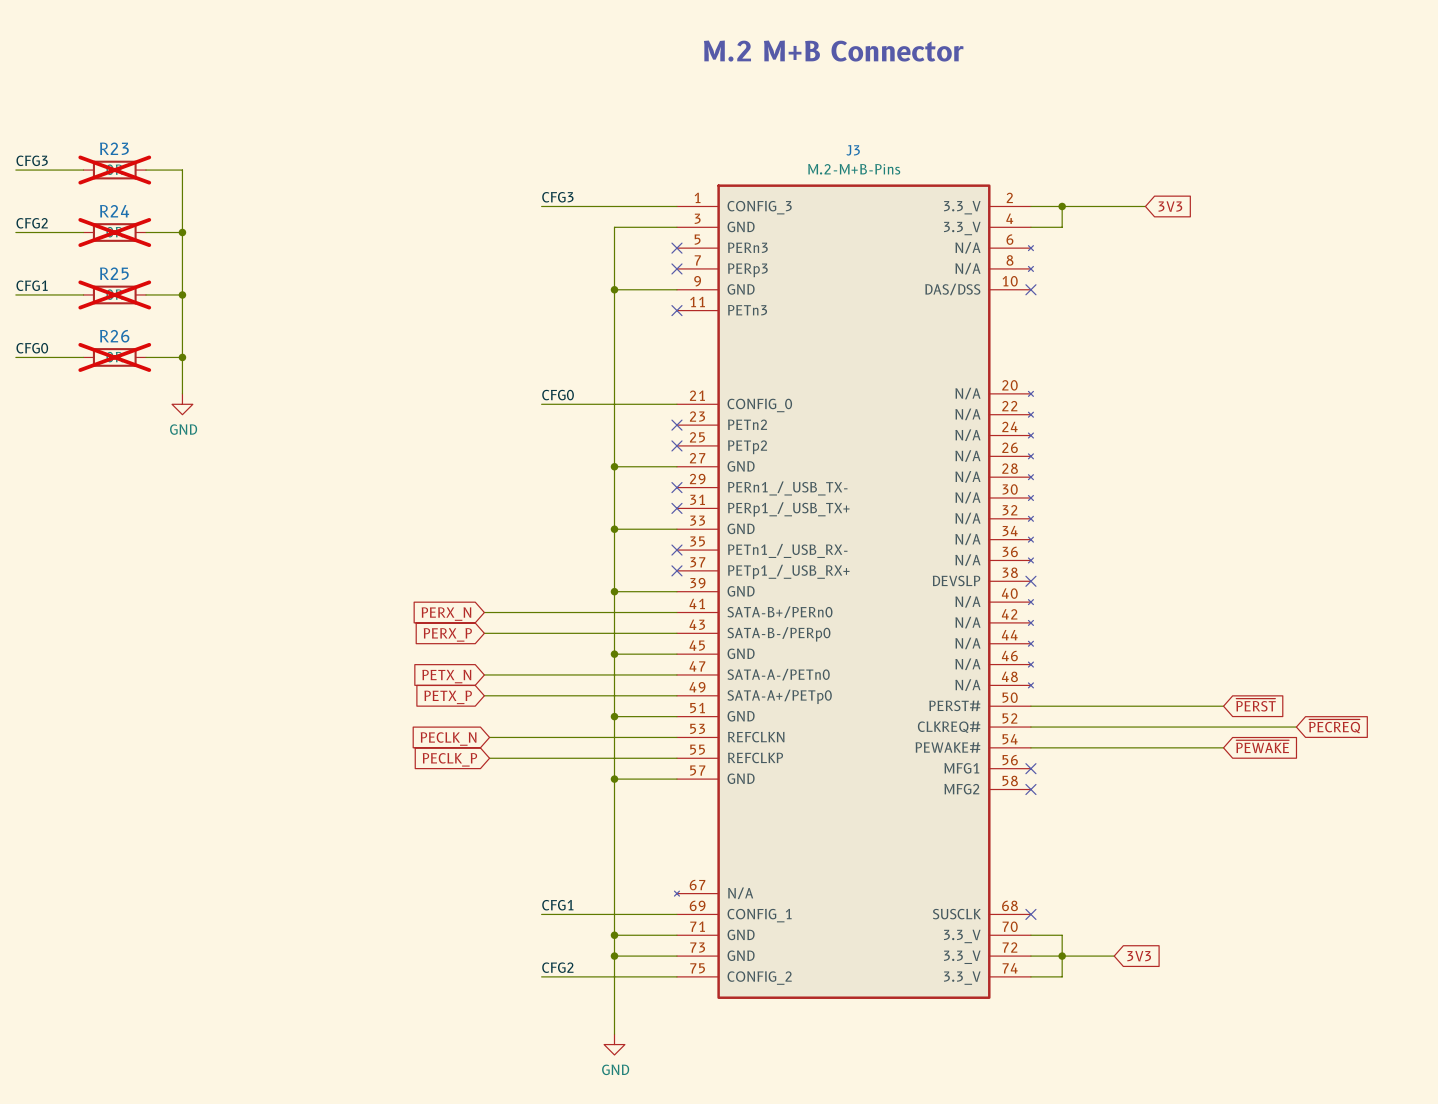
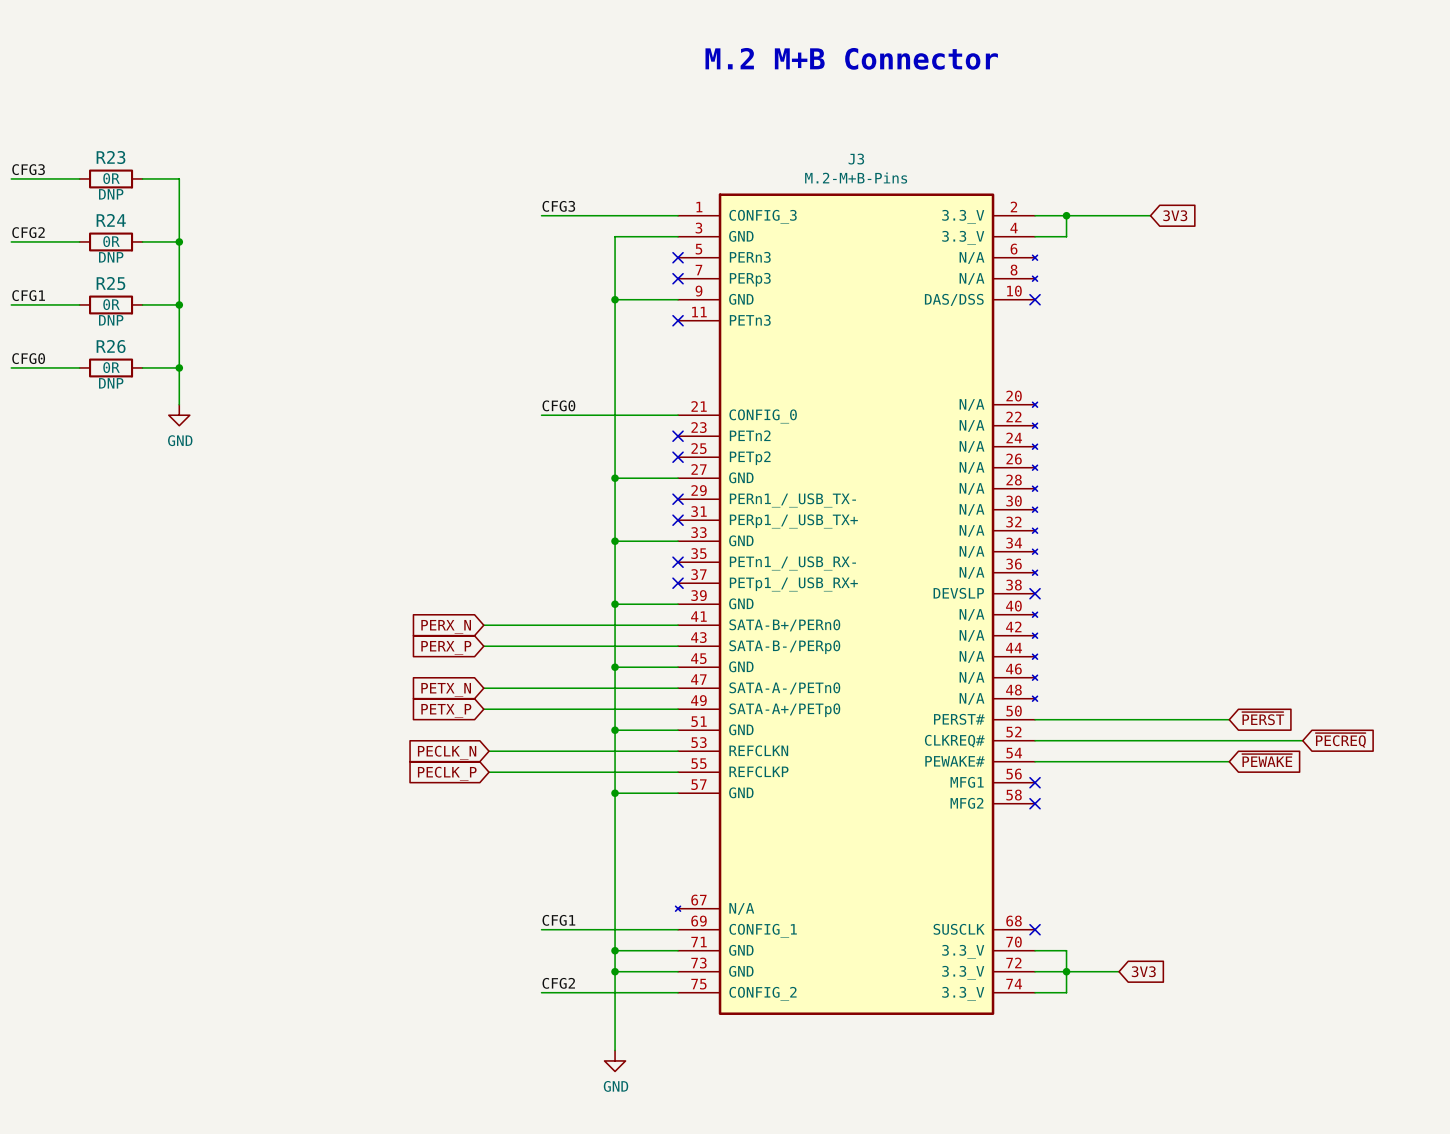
R23 do-not-place cross: (114, 170) -> none
R23 text: none -> DNP (111, 194)
R24 do-not-place cross: (114, 232) -> none
R24 text: none -> DNP (111, 257)
R25 do-not-place cross: (114, 294) -> none
R25 text: none -> DNP (111, 320)
R26 do-not-place cross: (114, 357) -> none
R26 text: none -> DNP (111, 383)

